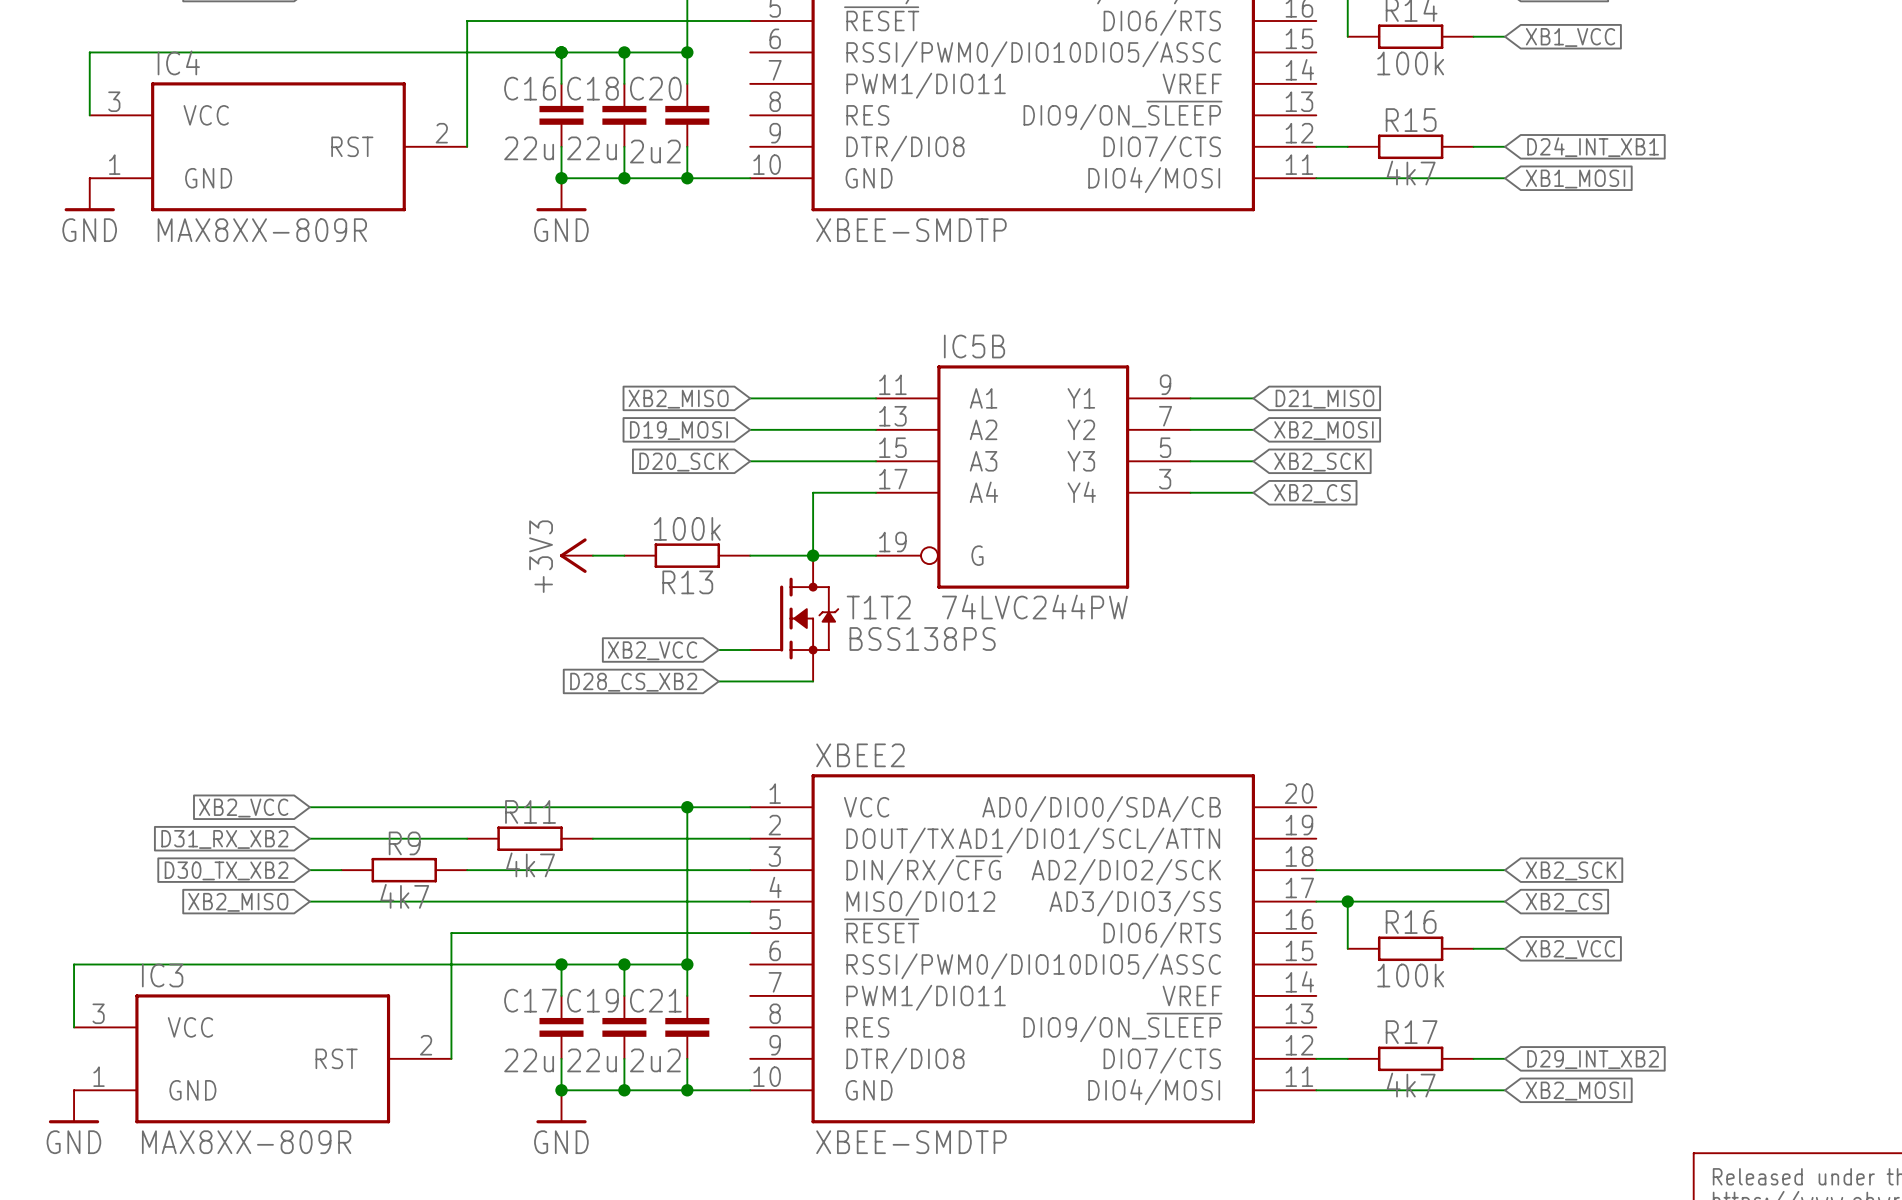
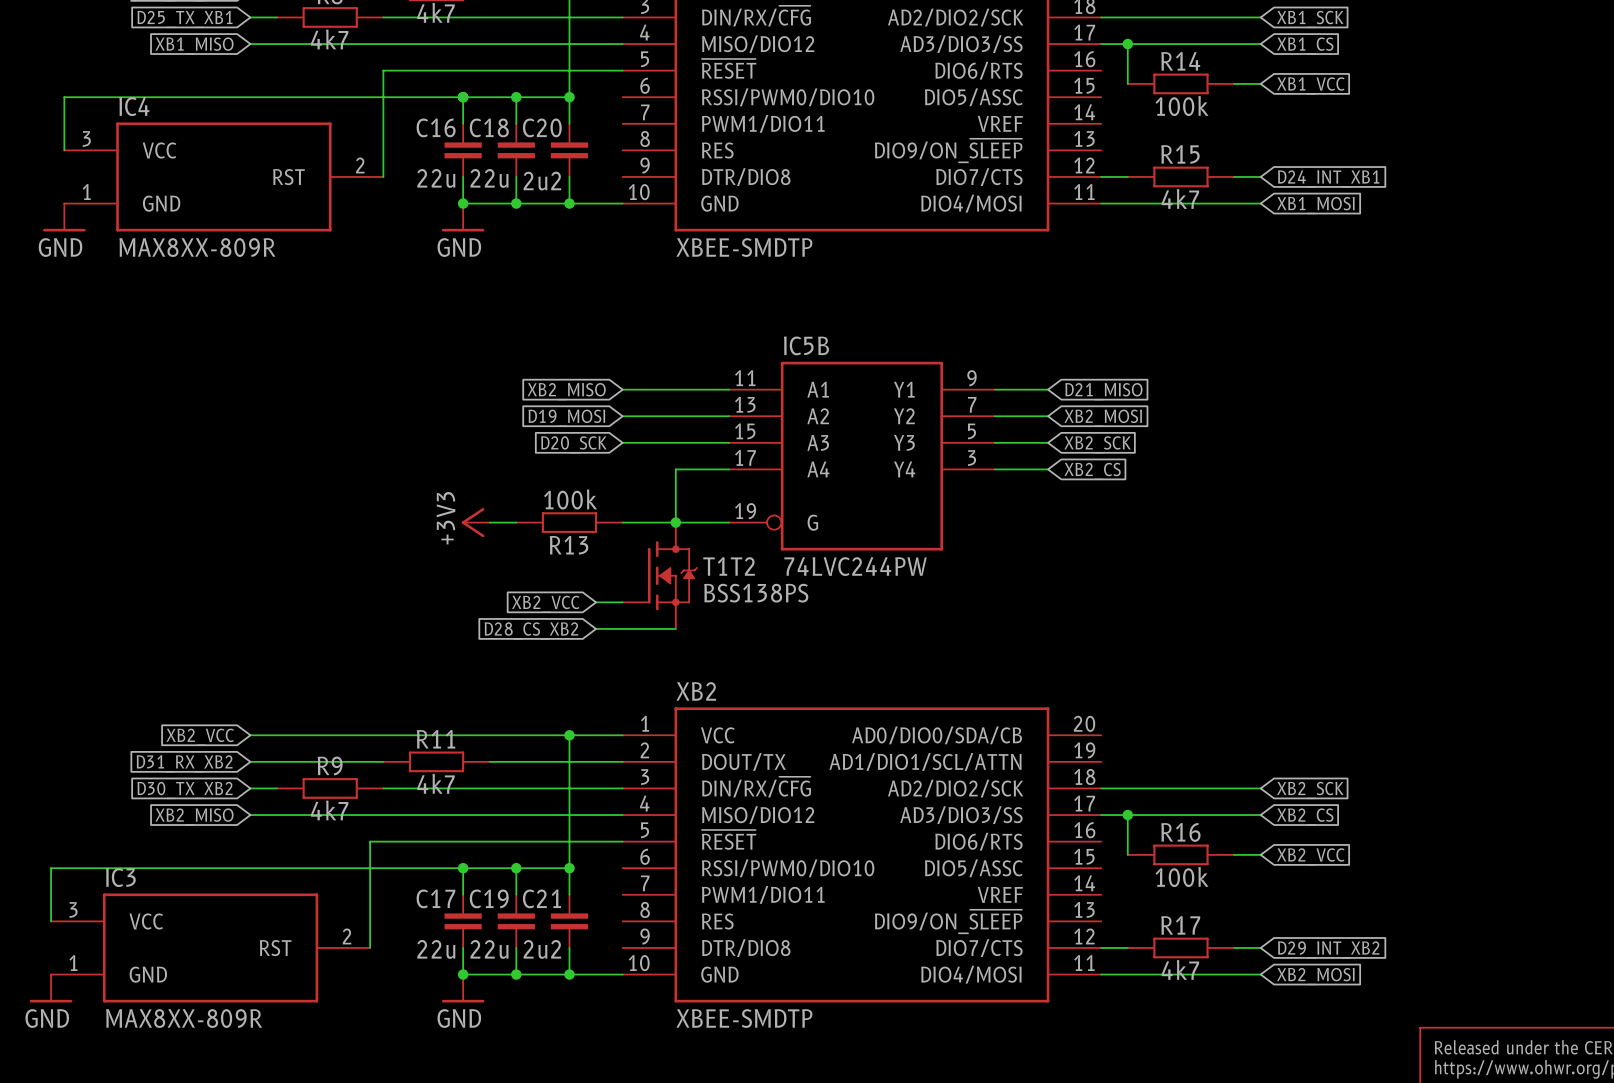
XBEE2 name: XBEE2 (860, 755) -> XB2 (696, 691)

